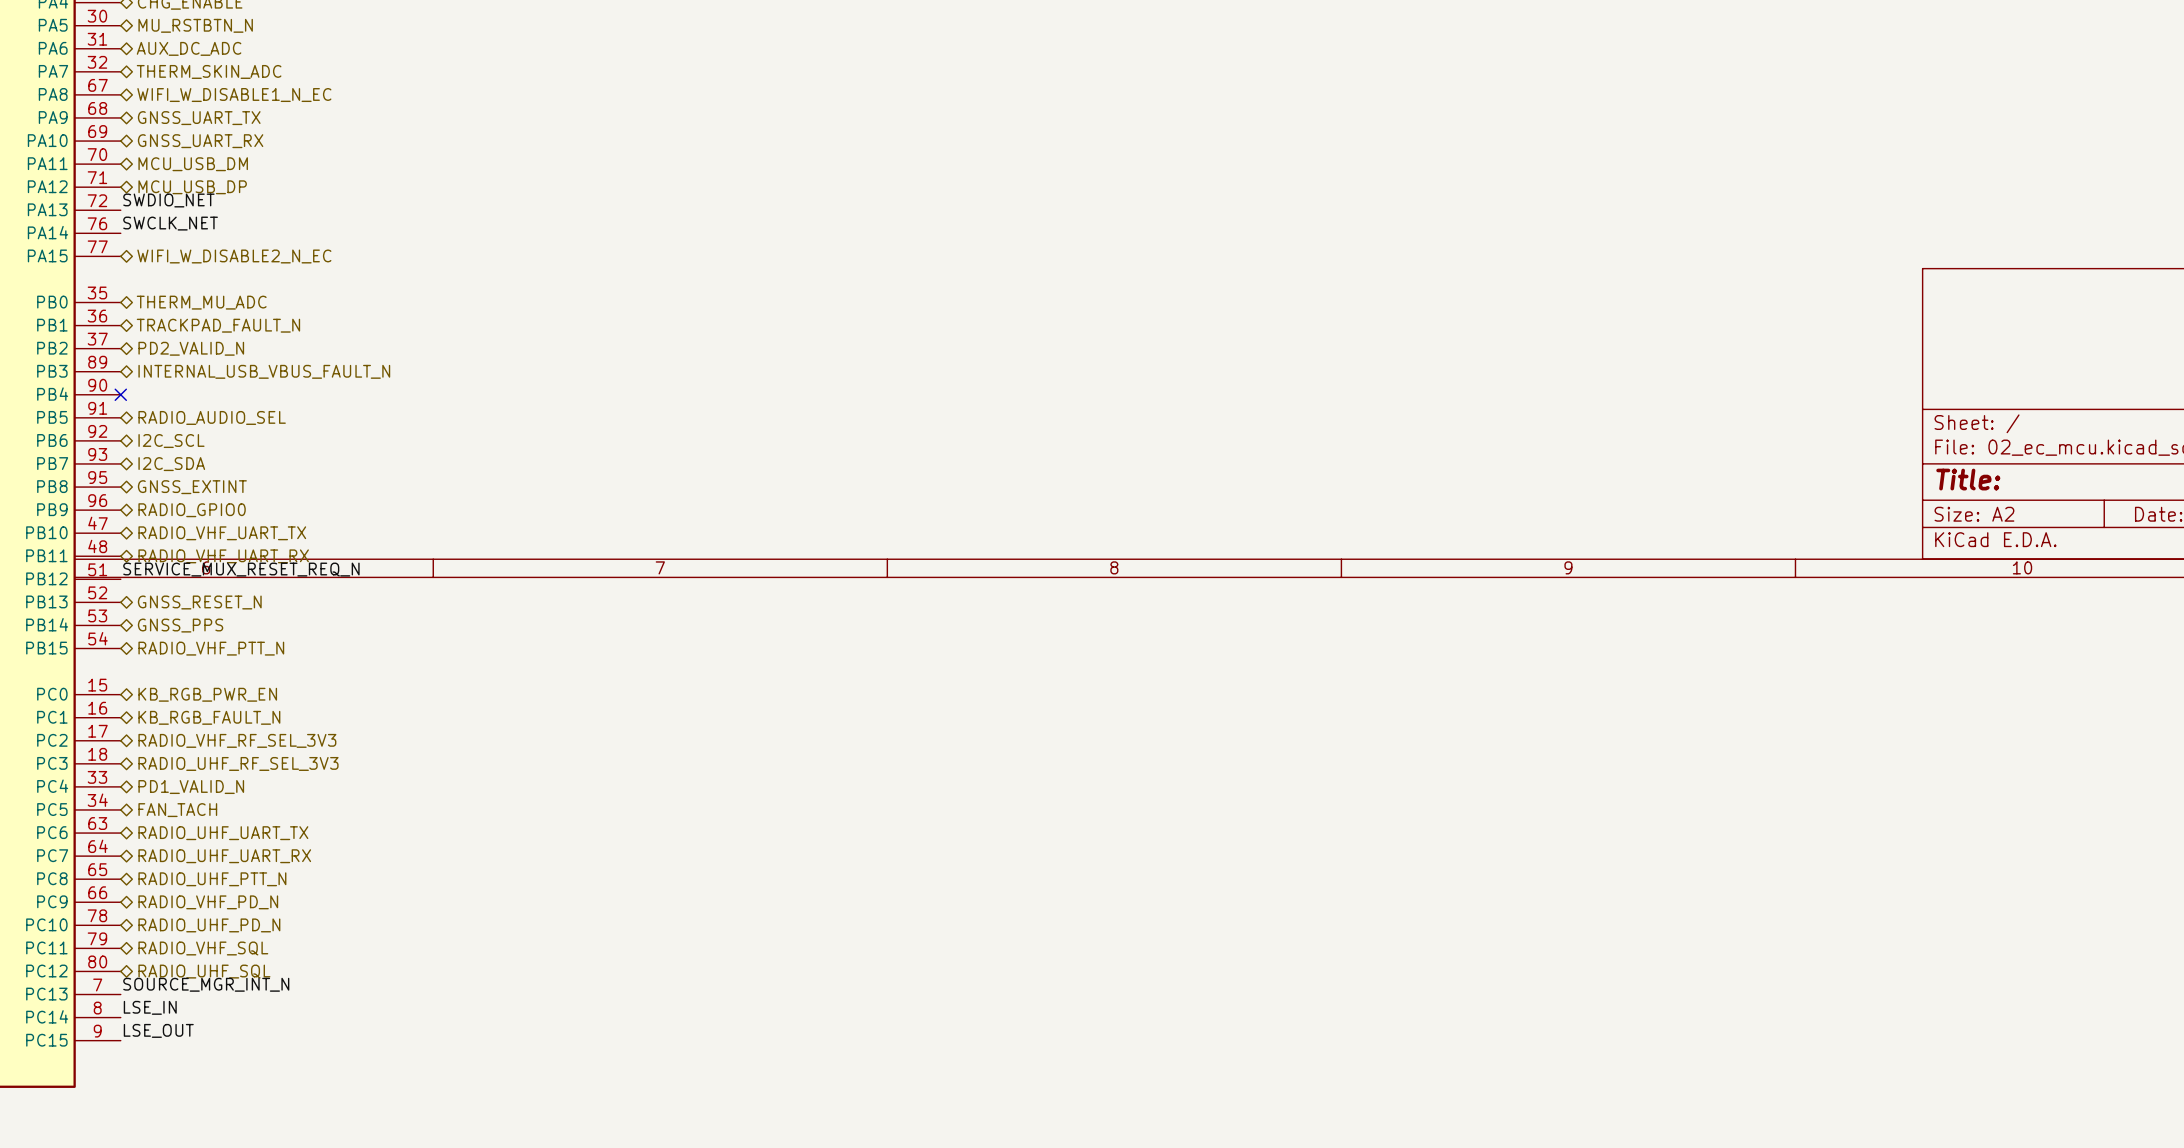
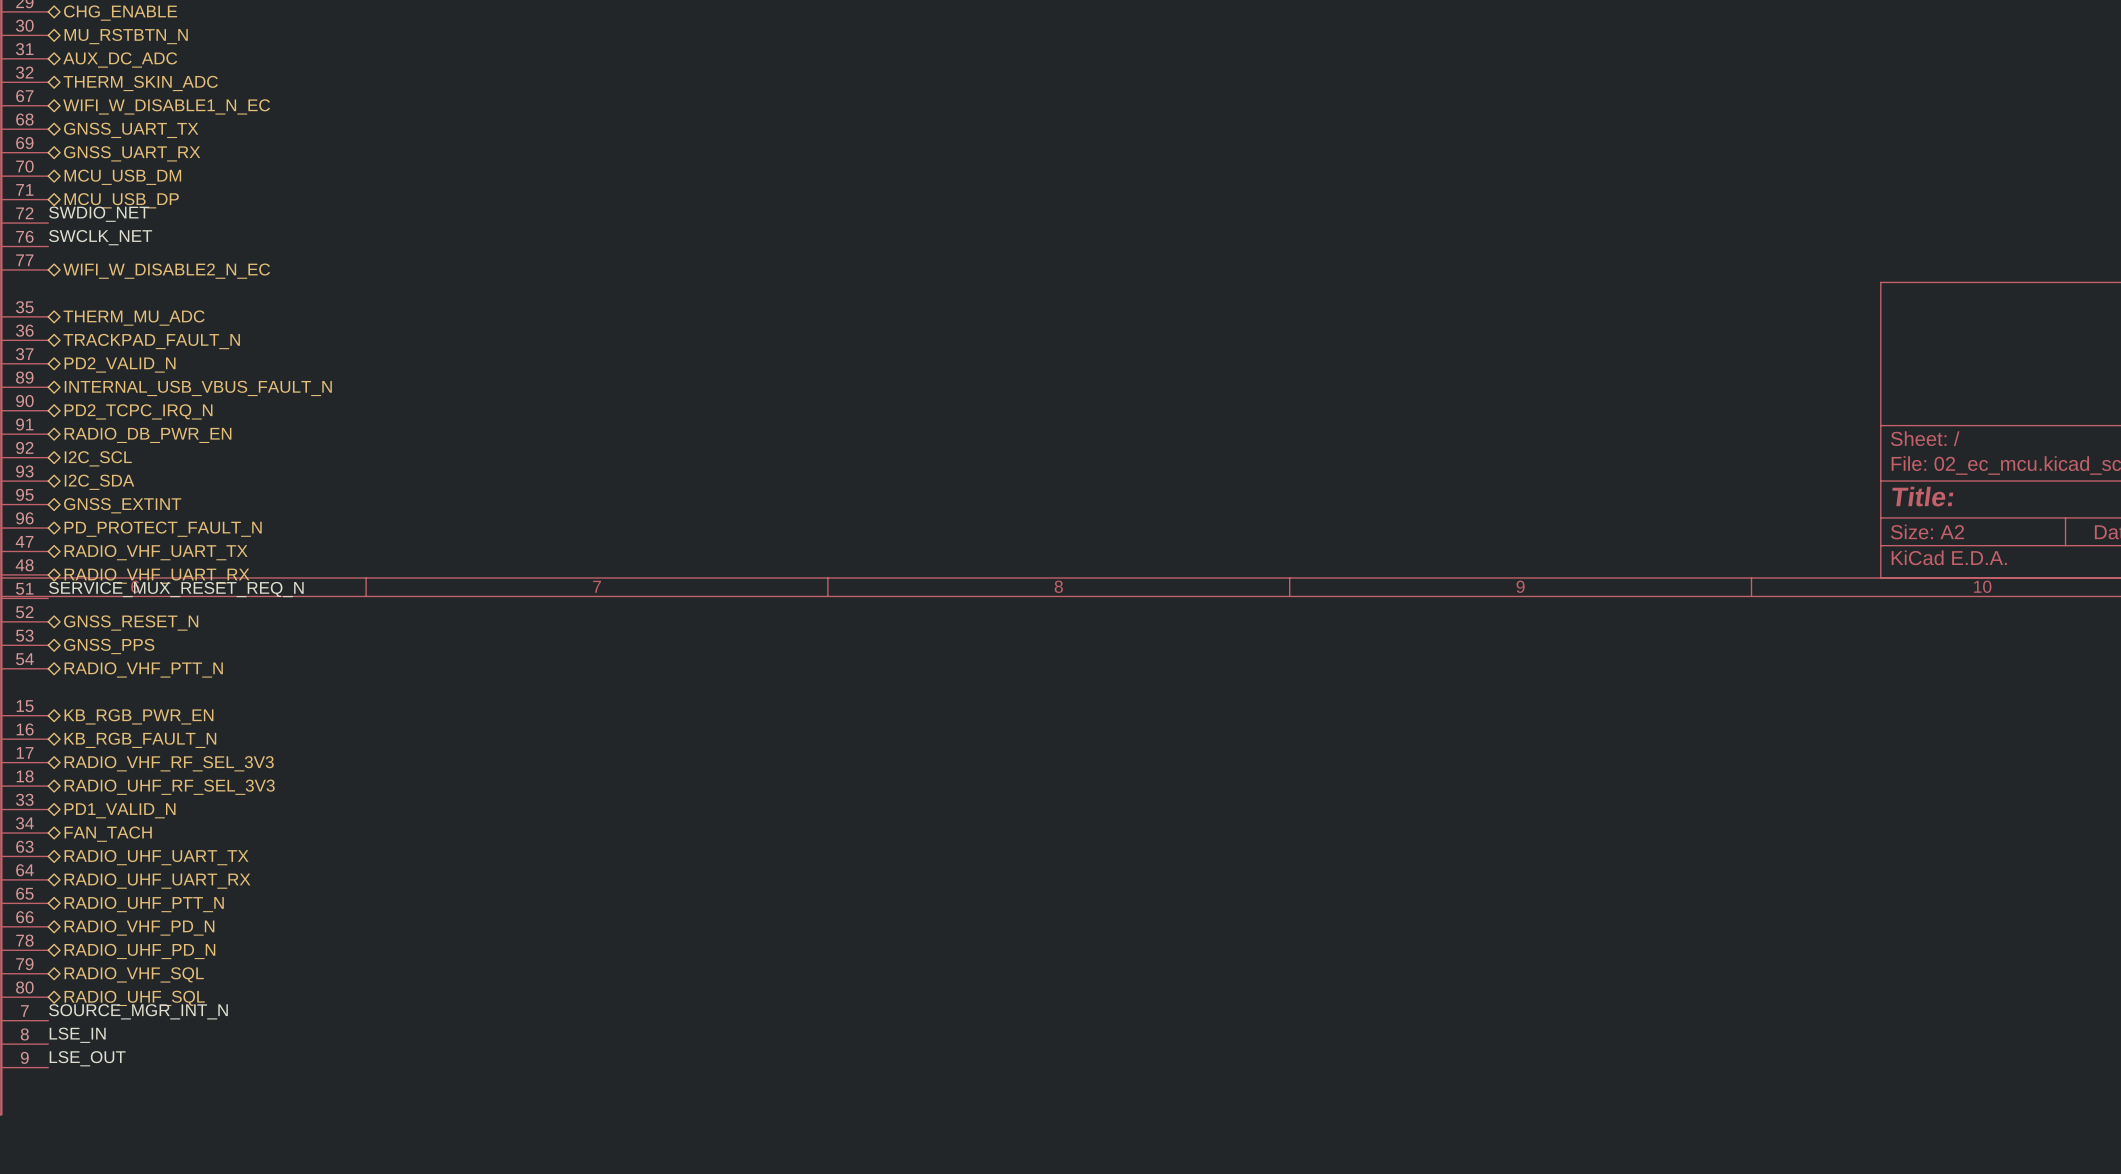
no-connect mark: (120, 394) -> none
hierarchical label: none -> PD2_TCPC_IRQ_N (138, 411)
hierarchical label: RADIO_AUDIO_SEL (212, 417) -> RADIO_DB_PWR_EN (147, 435)
hierarchical label: RADIO_GPIO0 (192, 510) -> PD_PROTECT_FAULT_N (163, 529)

